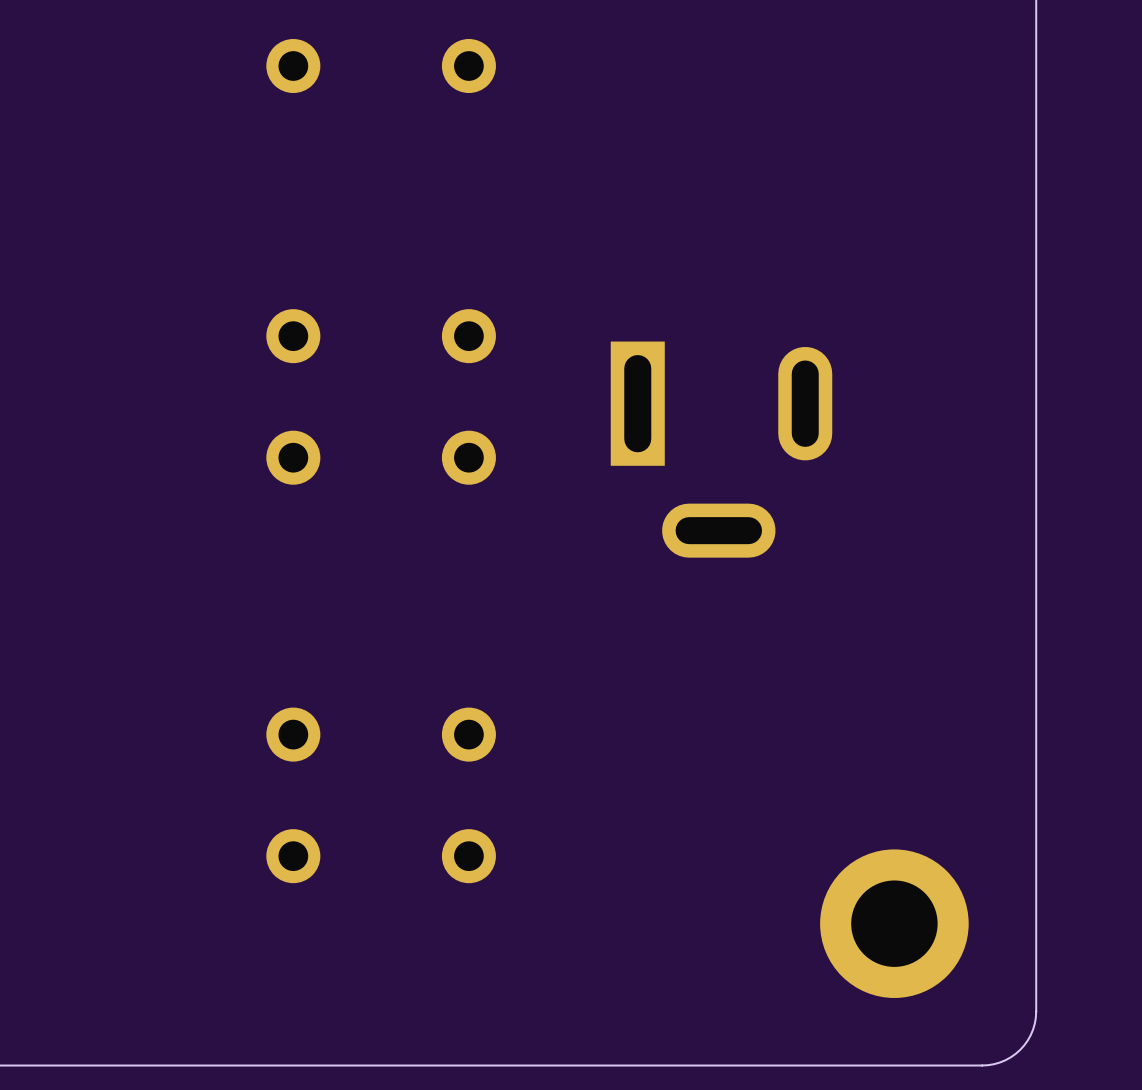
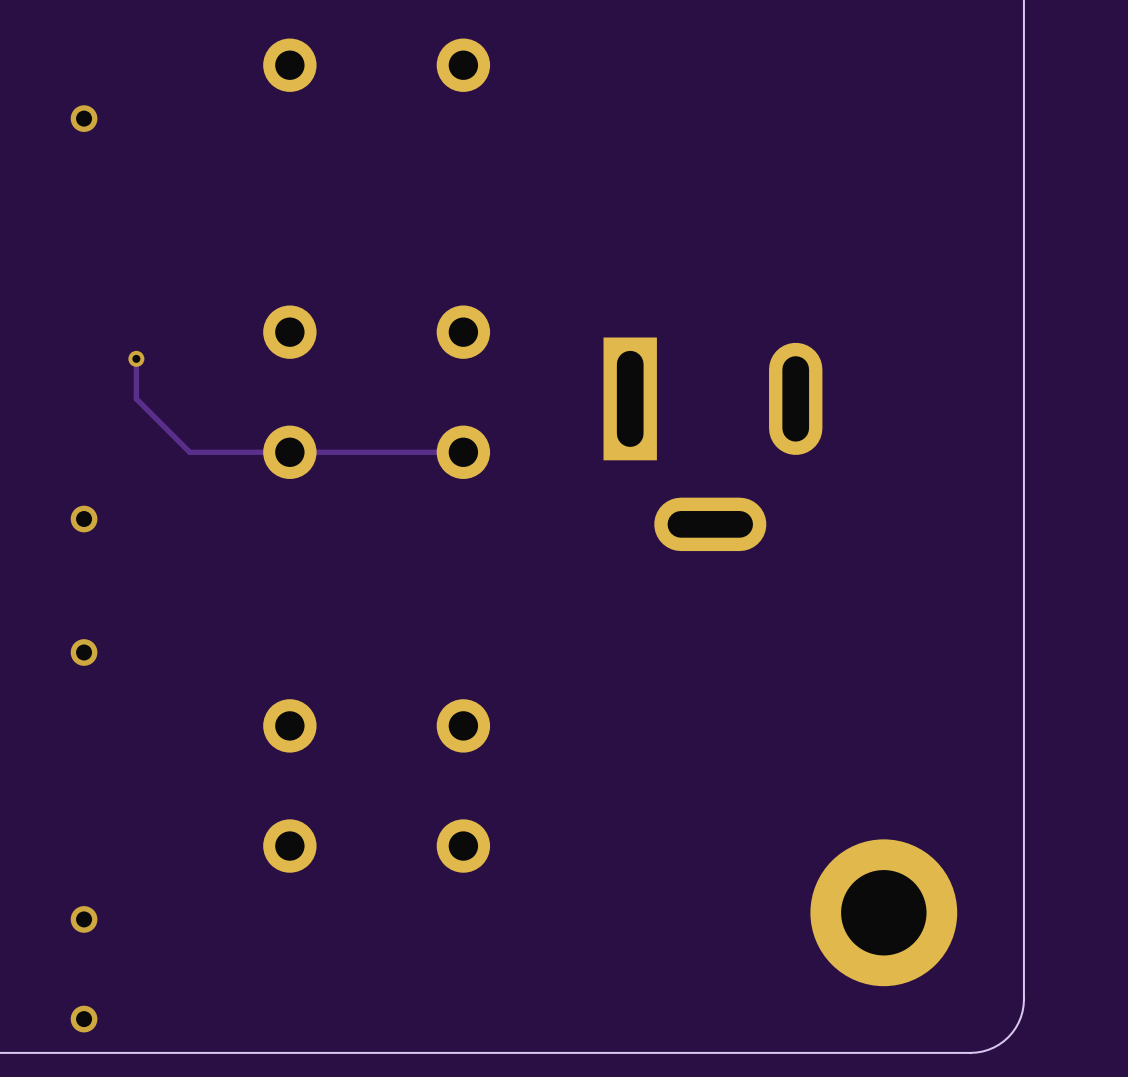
via: none -> (84, 118)
track: none -> (136, 358) (136, 398) (189, 452) (463, 452)
via: none -> (136, 358)
via: none -> (84, 519)
via: none -> (84, 652)
via: none -> (84, 919)
via: none -> (84, 1019)

